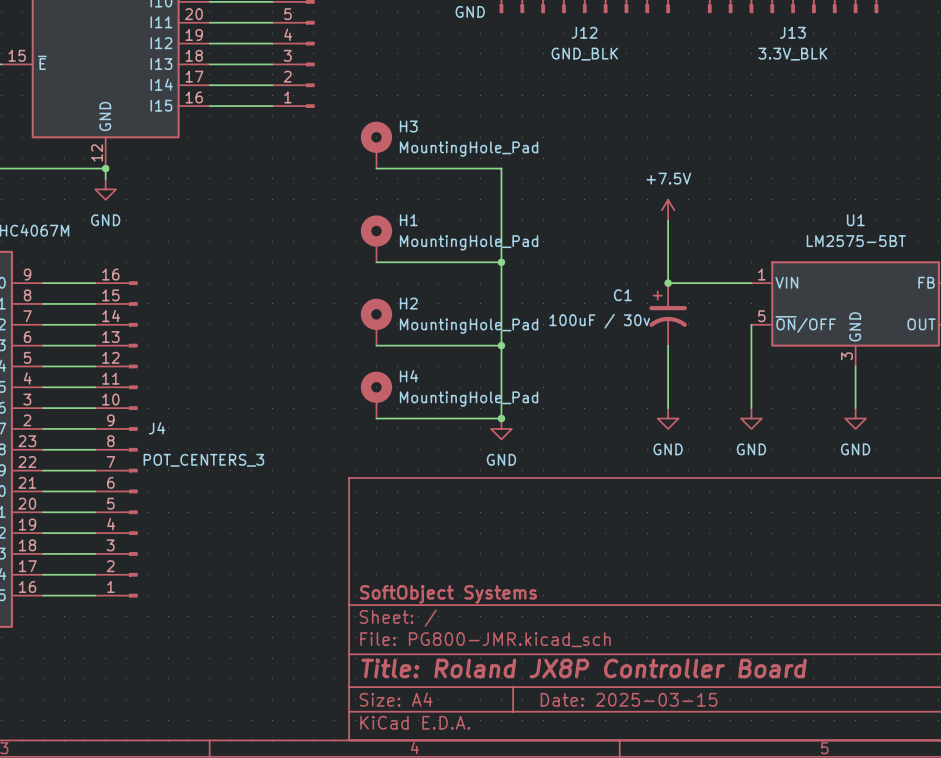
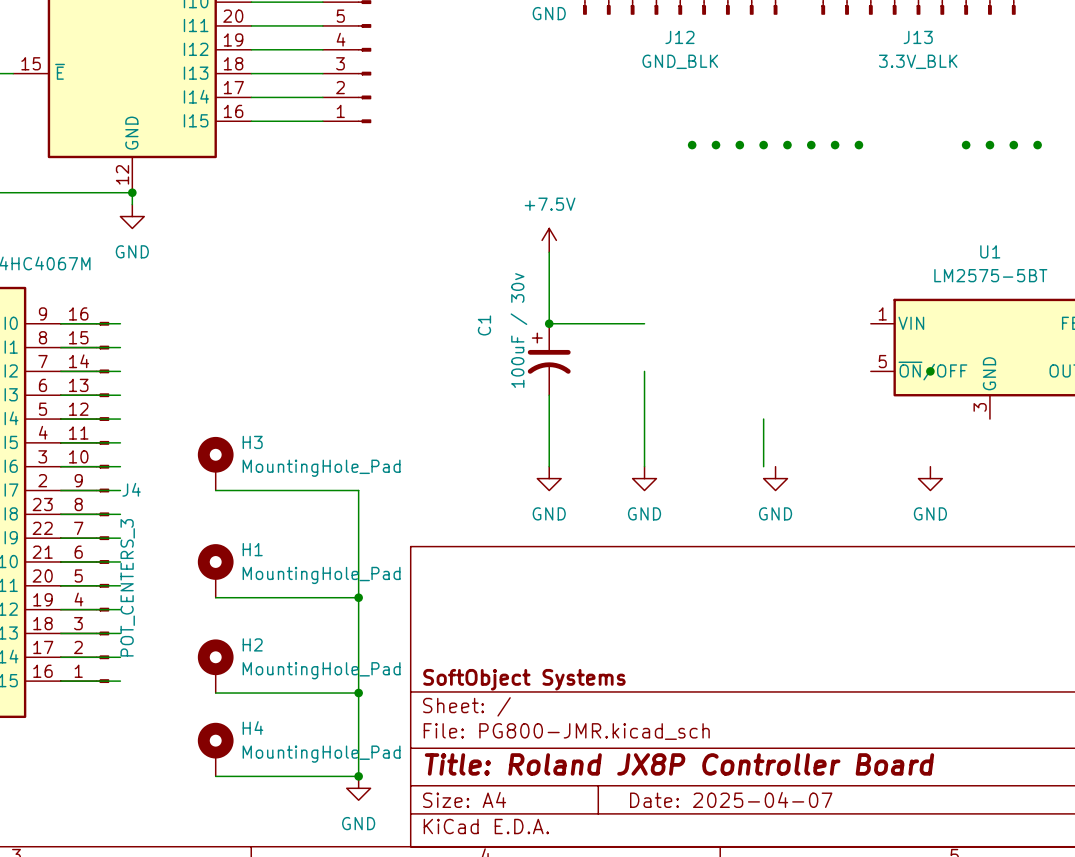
junction: none -> (692, 145)
junction: none -> (715, 145)
junction: none -> (739, 145)
junction: none -> (763, 145)
junction: none -> (787, 145)
junction: none -> (811, 145)
junction: none -> (835, 145)
junction: none -> (858, 145)
junction: none -> (966, 145)
junction: none -> (989, 145)
junction: none -> (1013, 145)
junction: none -> (1037, 145)
H3 position: (376, 145) -> (215, 463)
wire: (376, 168) (501, 168) (501, 418) (376, 418) -> none
power symbol position: +7.5V (668, 210) -> +7.5V (549, 240)
wire: (668, 220) (668, 283) (751, 283) -> (549, 252) (549, 323) (644, 323)
H1 position: (376, 238) -> (215, 570)
wire: (376, 262) (501, 262) -> none
junction: (501, 262) -> none
junction: none -> (549, 323)
junction: (668, 283) -> none
C1 name rotation: 0° (622, 295) -> 90° counterclockwise (484, 325)
C1 position: (668, 314) -> (549, 359)
C1 value rotation: 0° (599, 321) -> 90° counterclockwise (518, 330)
H2 position: (376, 322) -> (215, 666)
wire: (751, 324) (751, 408) -> (644, 371) (644, 466)
junction: none -> (930, 371)
wire: (376, 345) (501, 345) -> none
junction: (501, 345) -> none
wire: (668, 345) (668, 408) -> (549, 395) (549, 466)
wire: (855, 366) (855, 408) -> (763, 419) (763, 466)
H4 position: (376, 395) -> (215, 749)
power symbol: none -> GND (549, 478)
junction: (501, 418) -> none
power symbol: none -> GND (644, 478)
power symbol: GND (751, 418) -> none
power symbol: none -> GND (930, 478)
power symbol: GND (855, 418) -> none
wire: none -> (215, 490) (358, 490) (358, 776) (215, 776)
power symbol: GND (501, 428) -> none
J4 position: (116, 439) -> (85, 502)
J4 value rotation: 0° (203, 460) -> 90° counterclockwise (127, 587)
wire: none -> (215, 597) (358, 597)
junction: none -> (358, 597)
wire: none -> (215, 693) (358, 693)
junction: none -> (358, 693)
junction: none -> (358, 776)
power symbol: none -> GND (358, 788)
title block: Date: 2025-03-15 (629, 699) -> Date: 2025-04-07 (731, 799)

